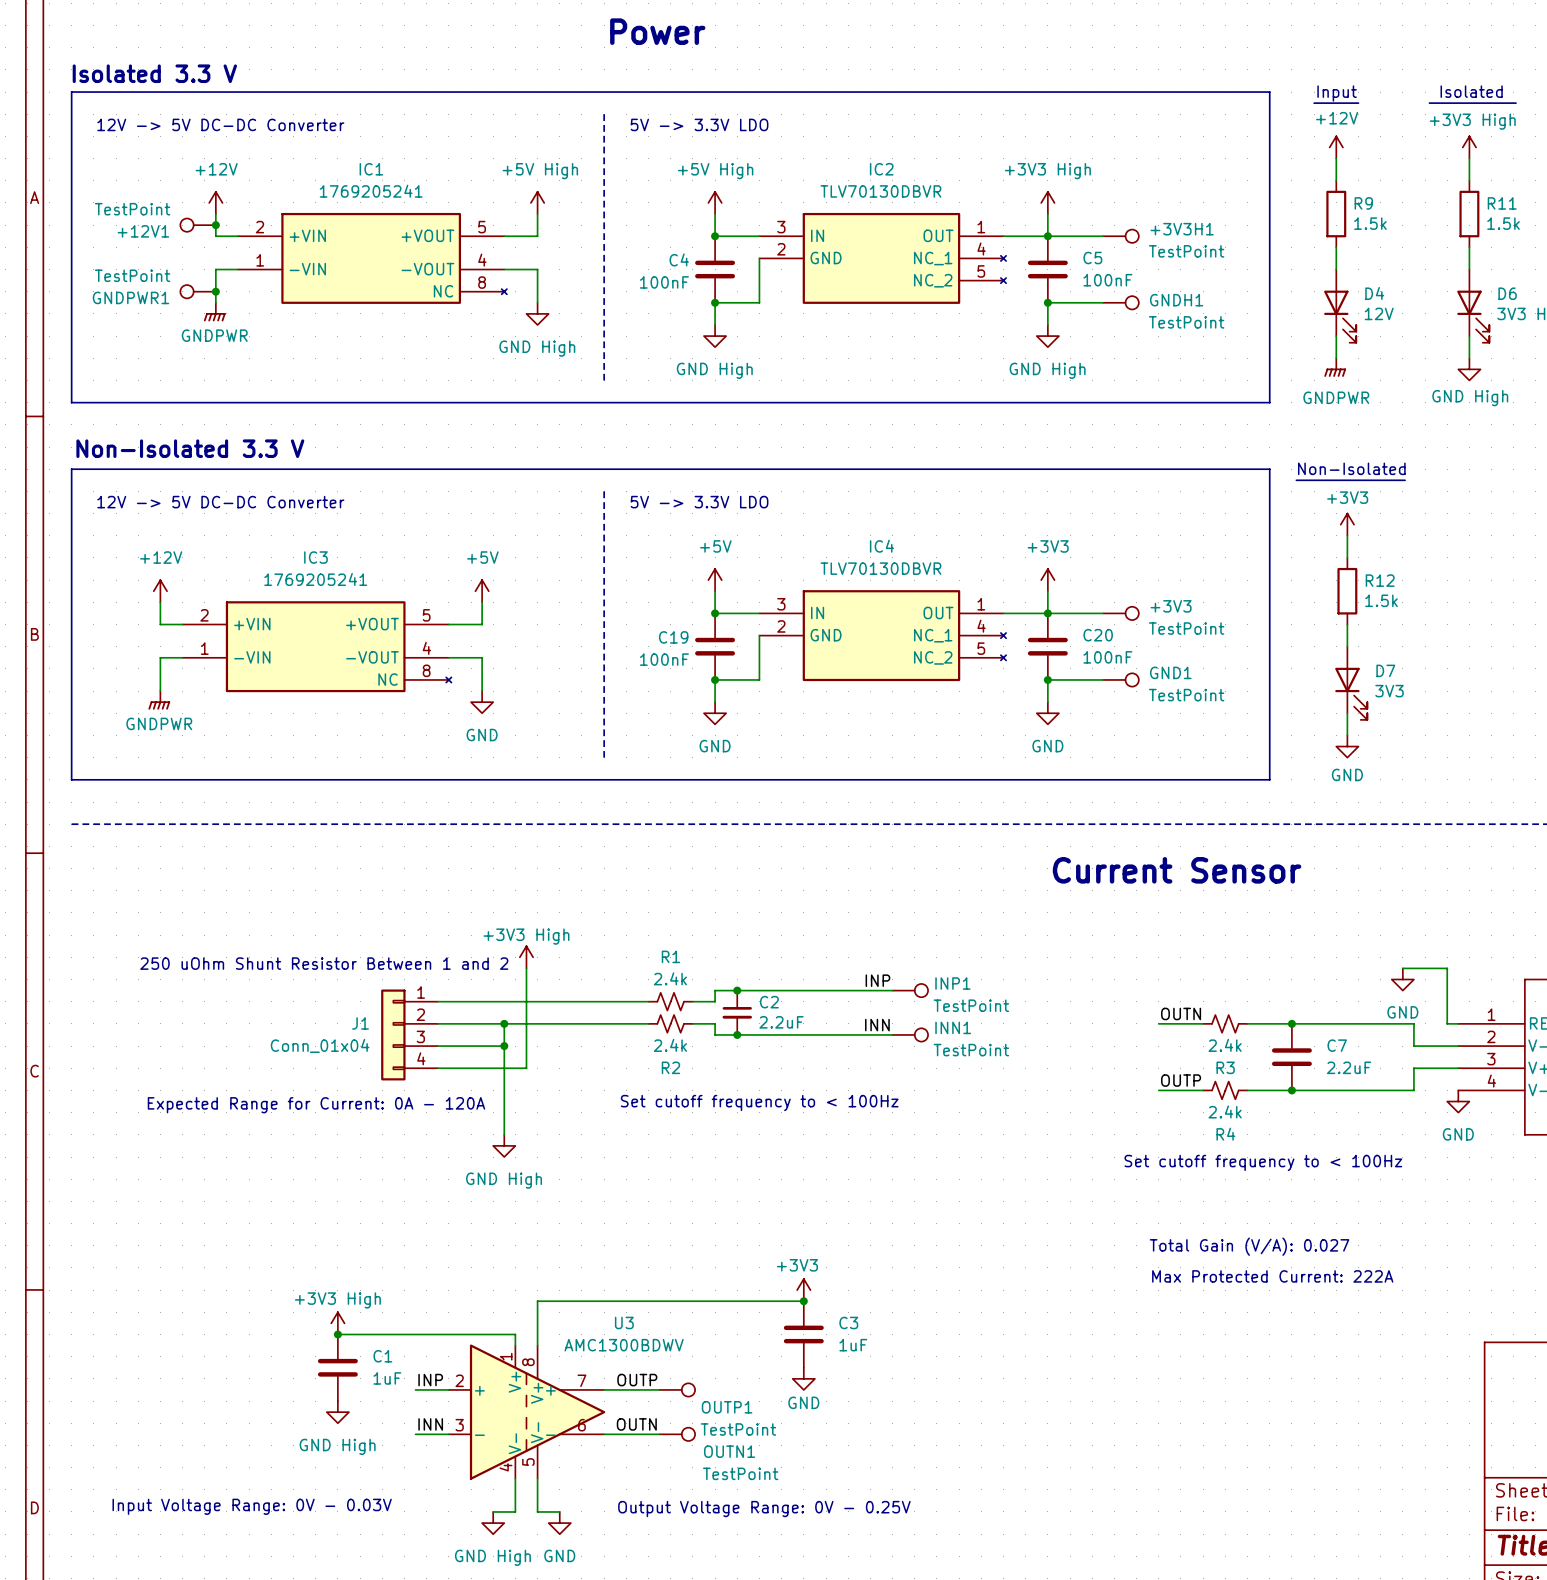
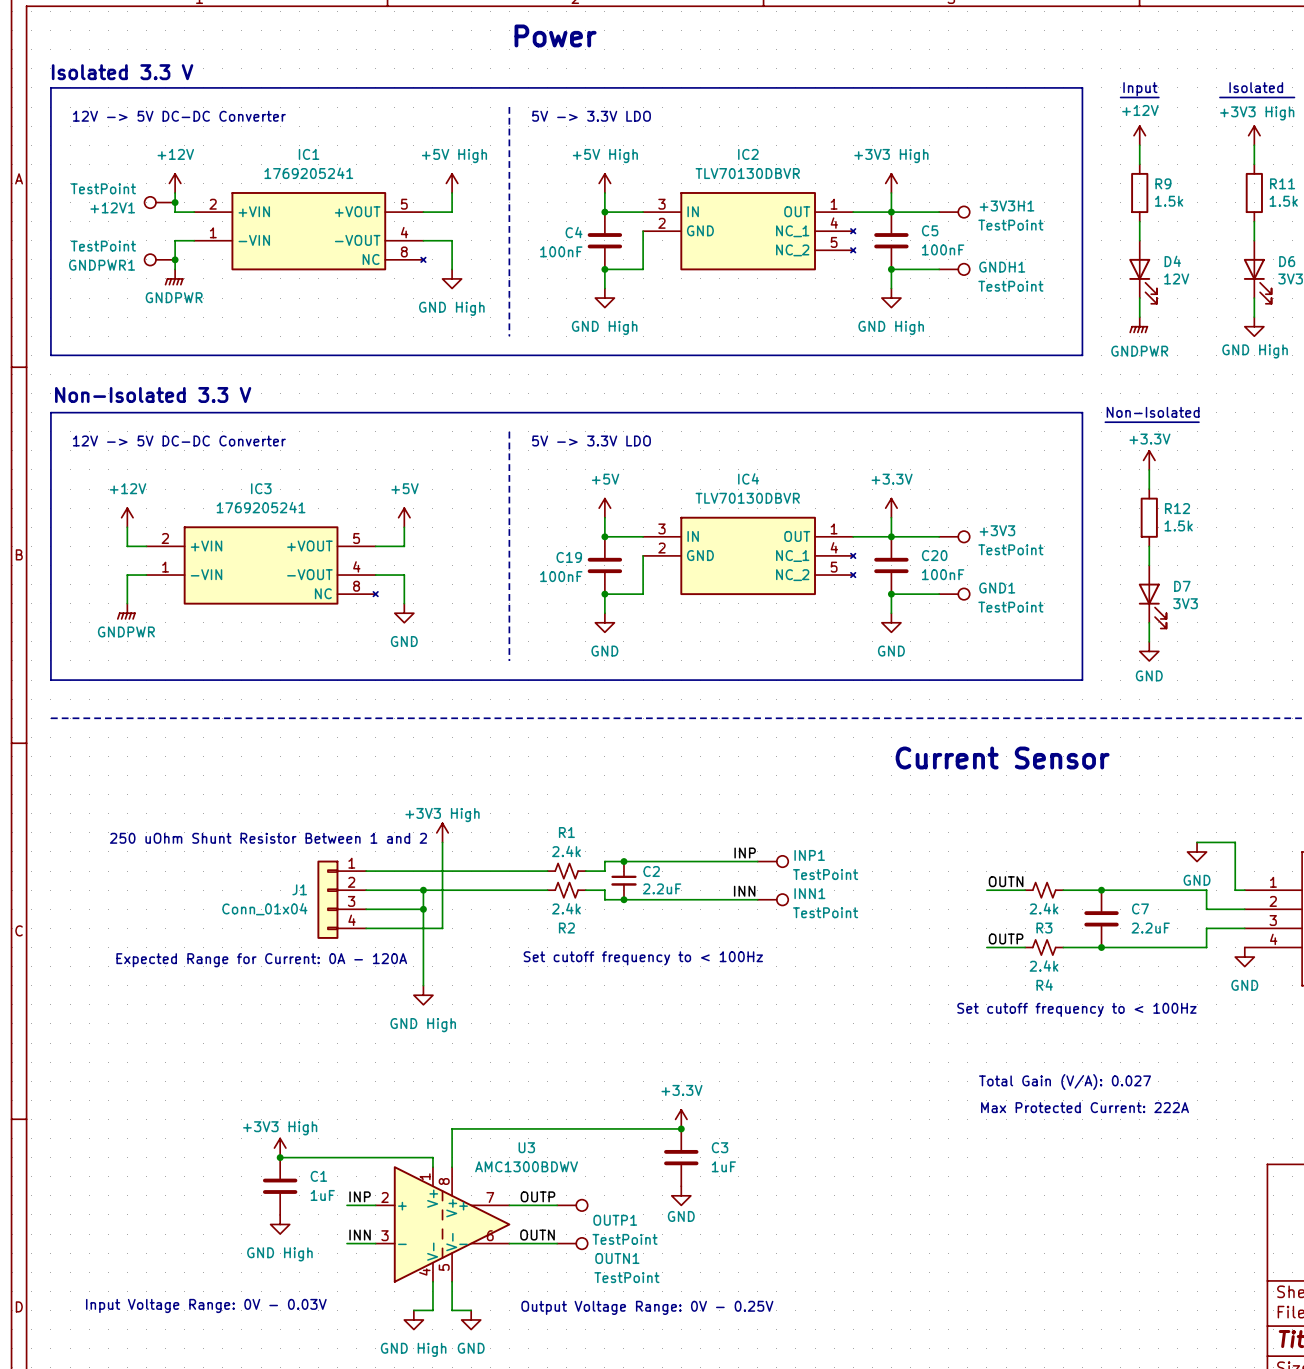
power symbol: +3V3 (1347, 524) -> +3.3V (1149, 460)
power symbol: +3V3 (1047, 580) -> +3.3V (891, 508)
power symbol: +3V3 (803, 1290) -> +3.3V (681, 1119)

